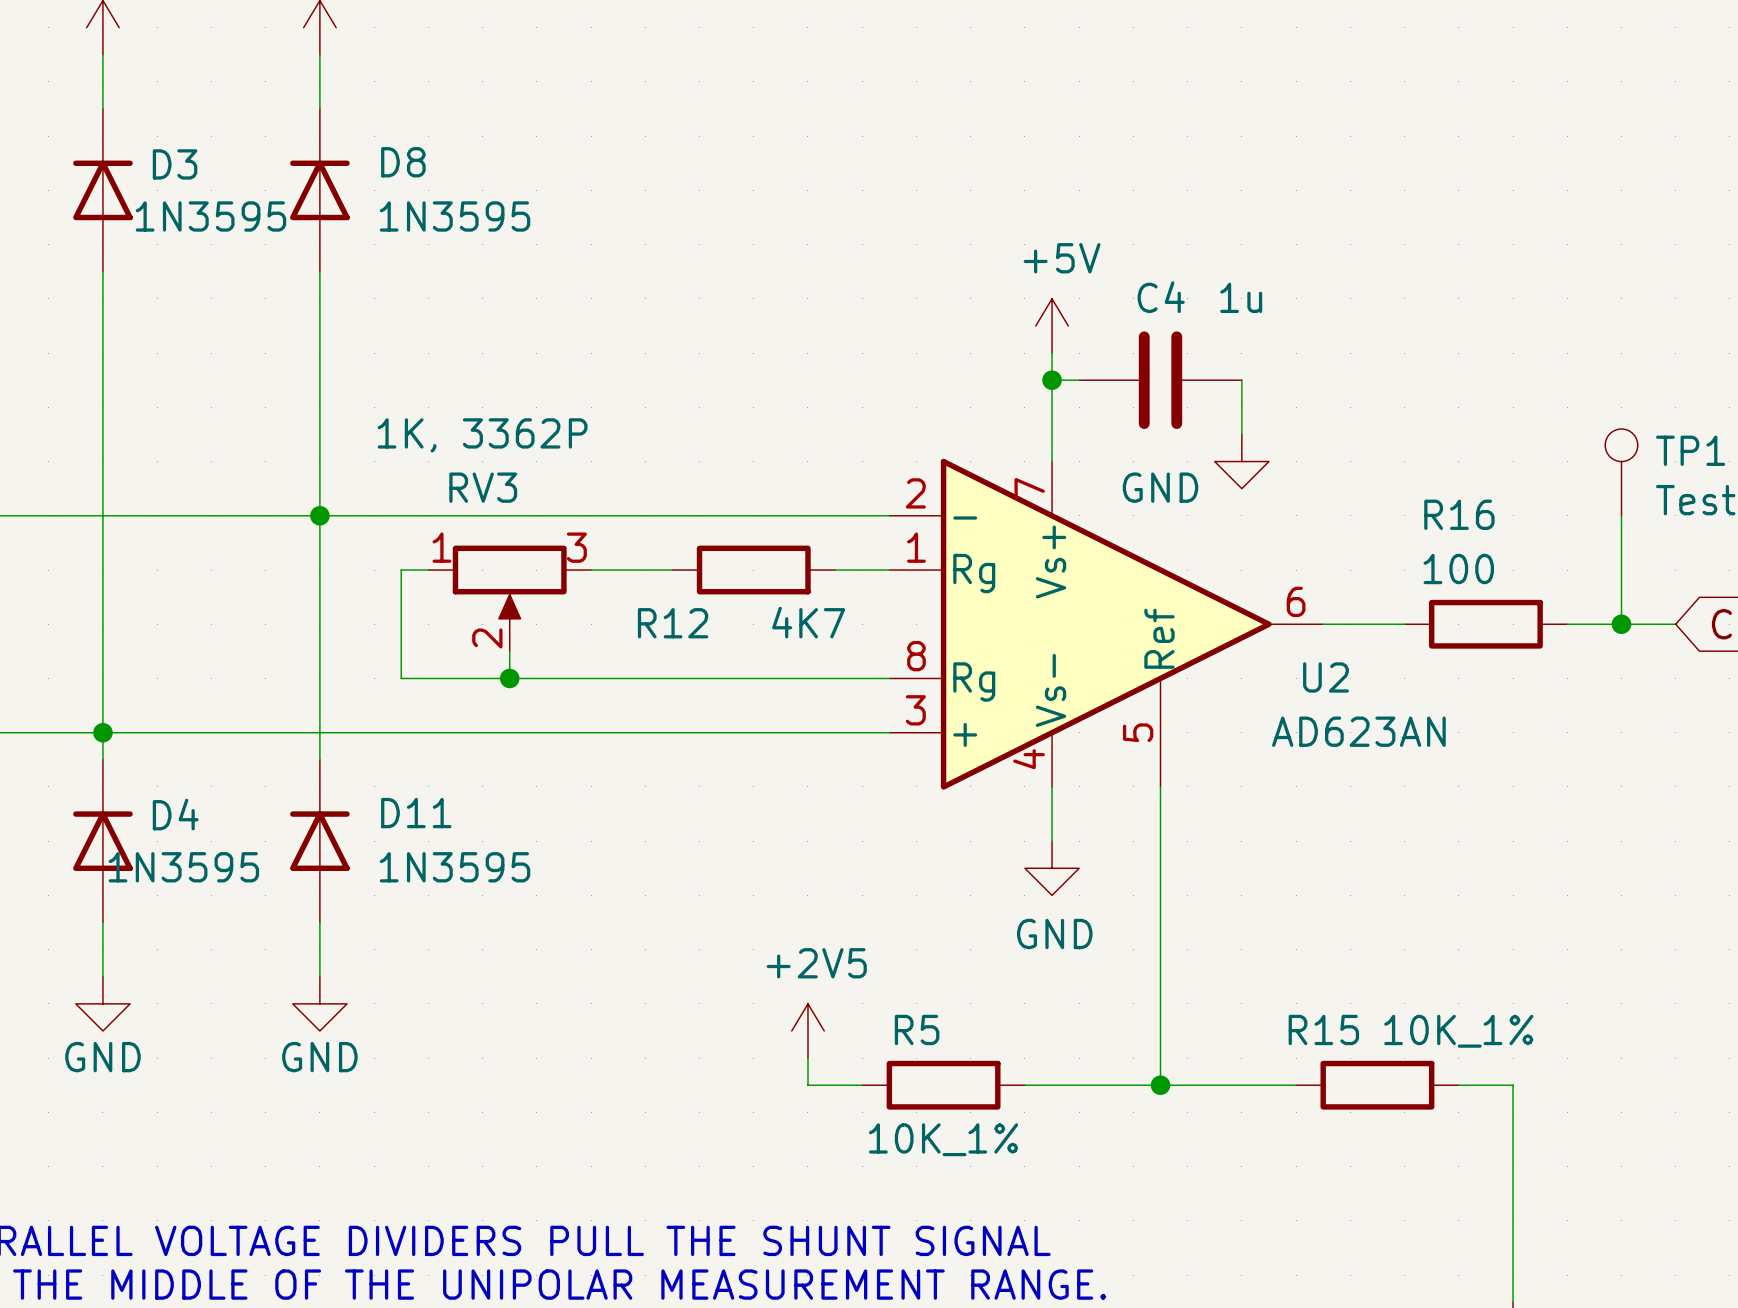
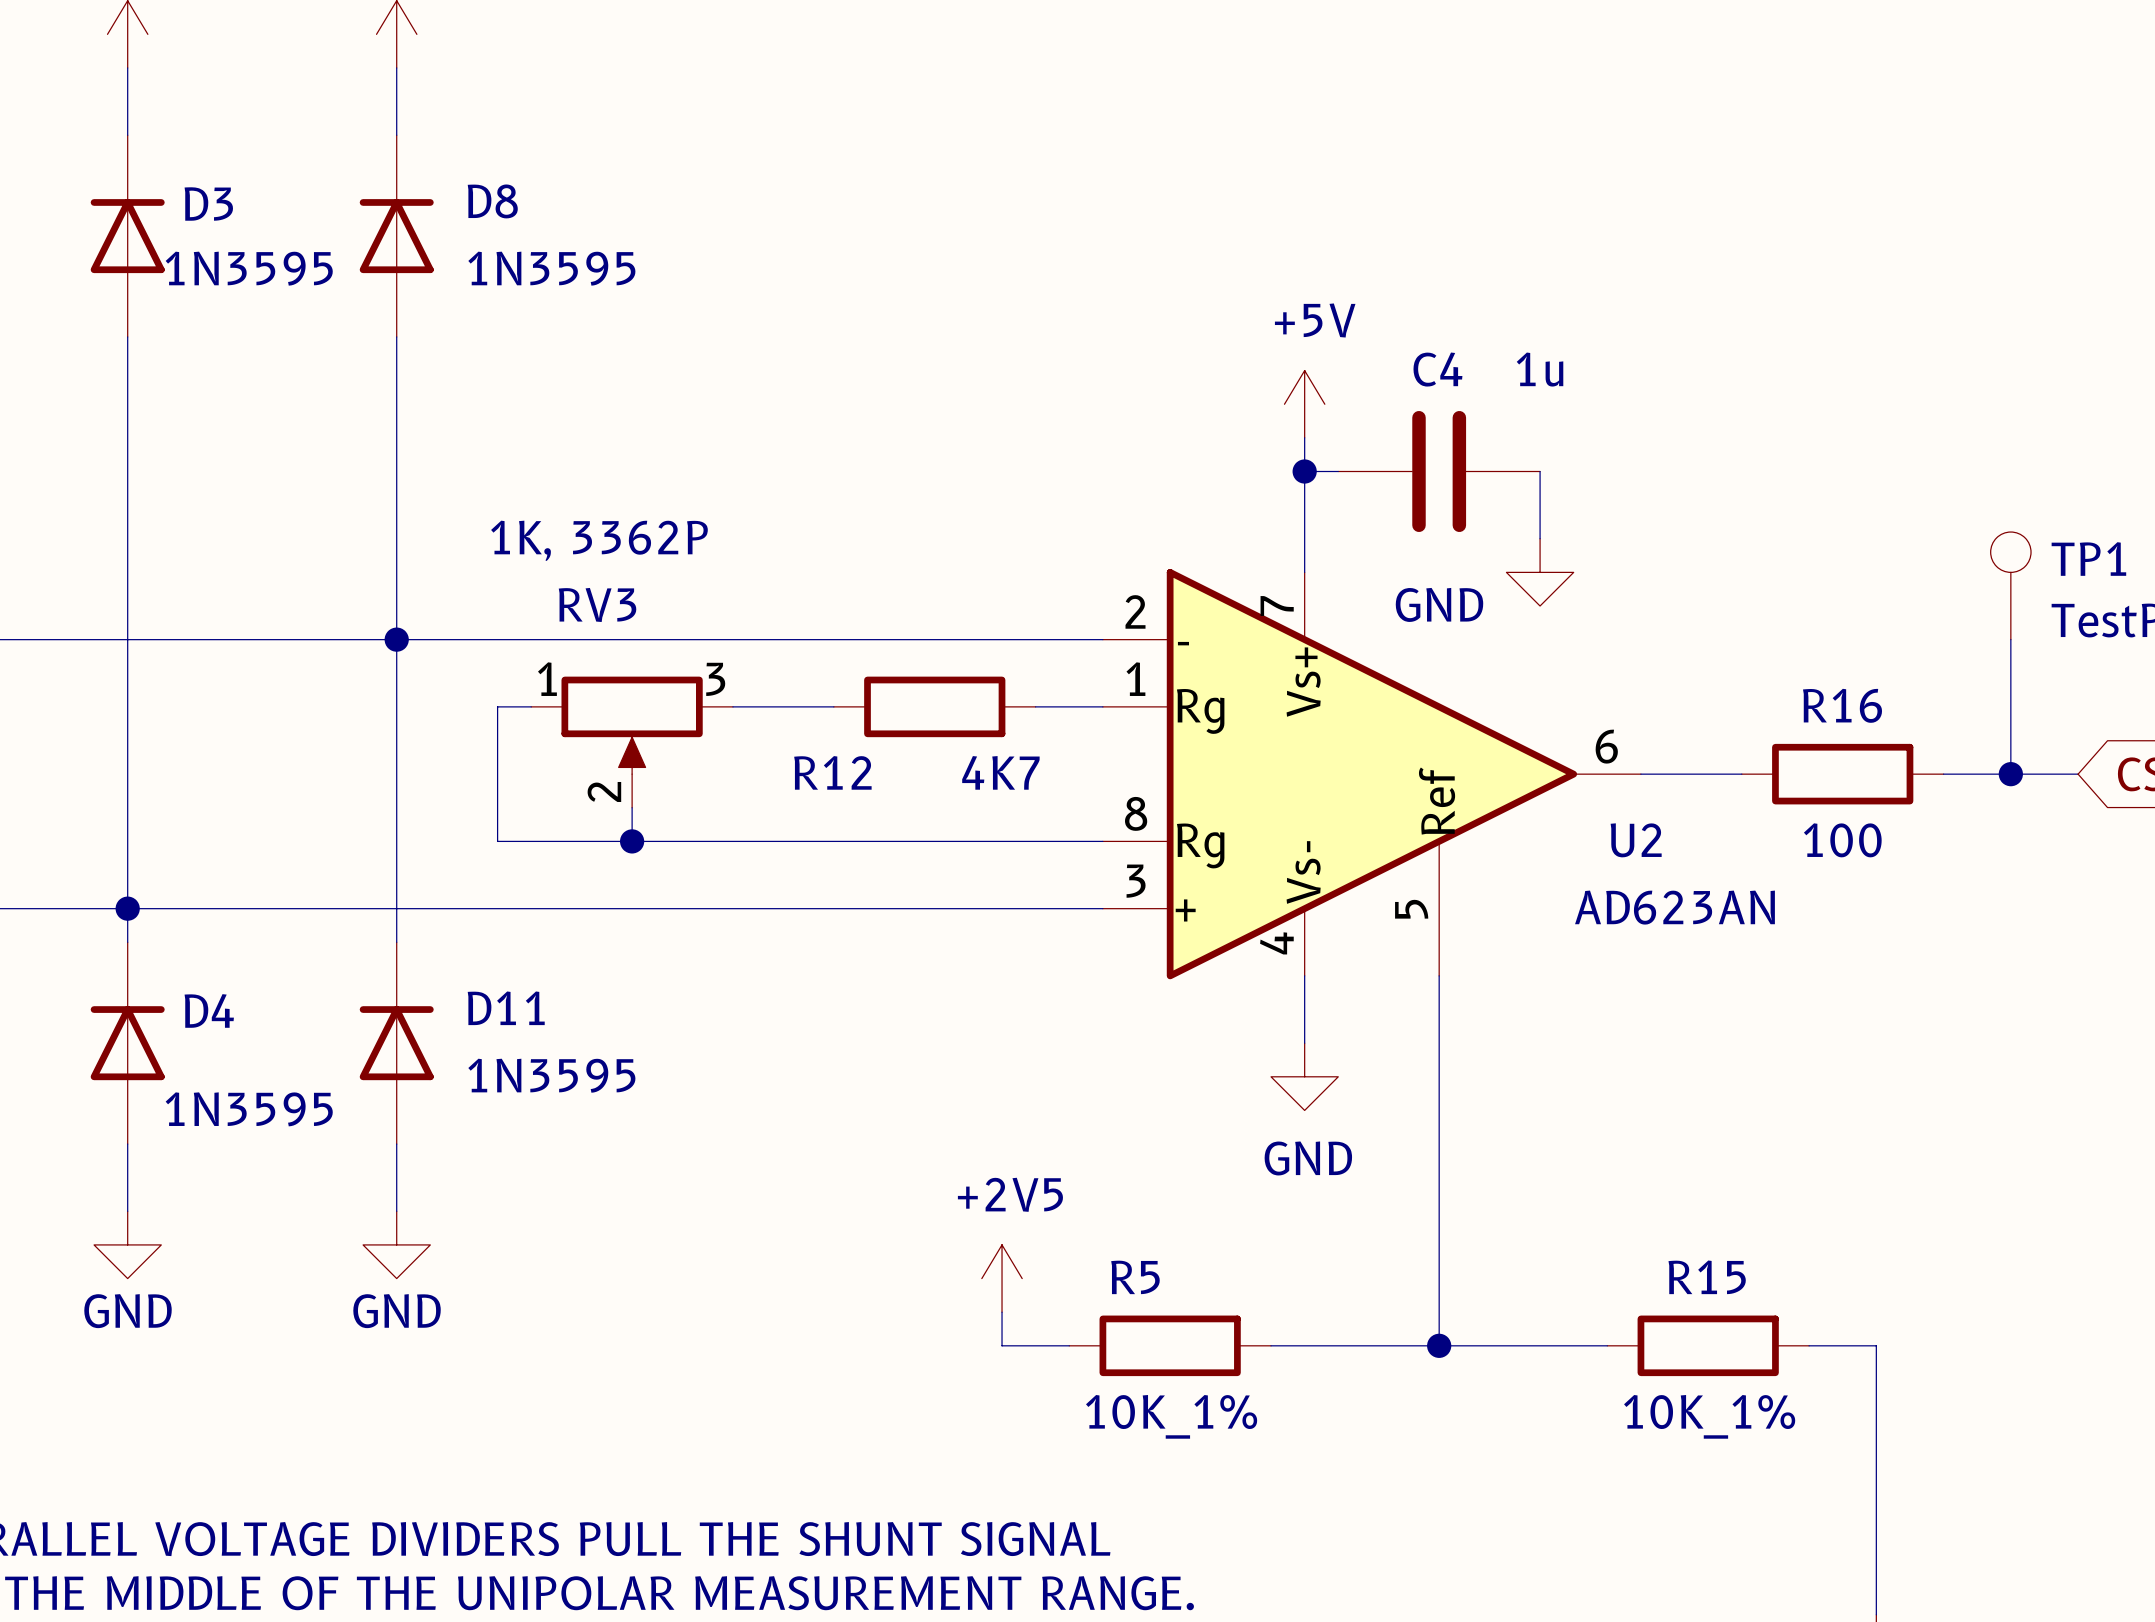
R16 name position: R16 (1459, 514) -> R16 (1842, 705)
R16 value position: 100 (1458, 569) -> 100 (1842, 840)
D11 value position: 1N3595 (183, 867) -> 1N3595 (249, 1109)
R15 name position: R15 (1323, 1029) -> R15 (1707, 1277)
R15 value position: 10K_1% (1458, 1031) -> 10K_1% (1709, 1416)

